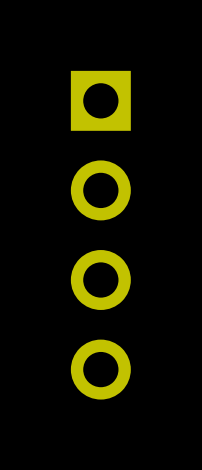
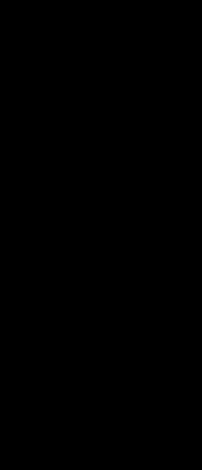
part: (100, 235) -> none

